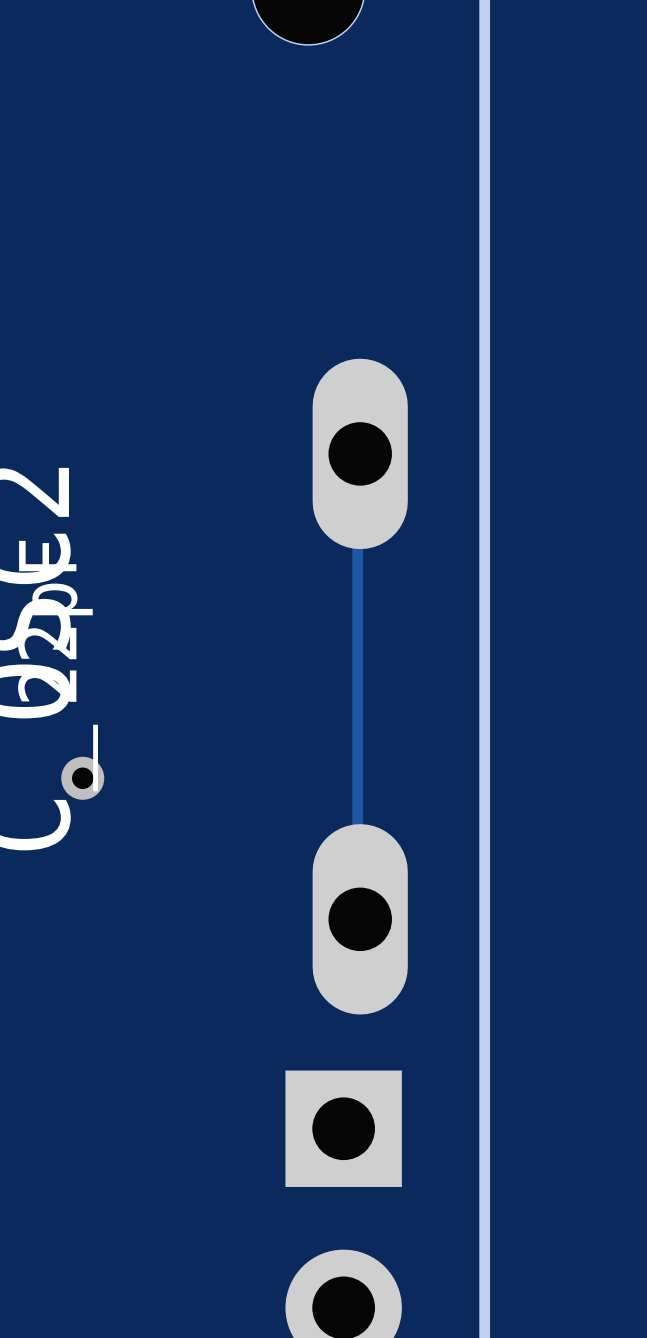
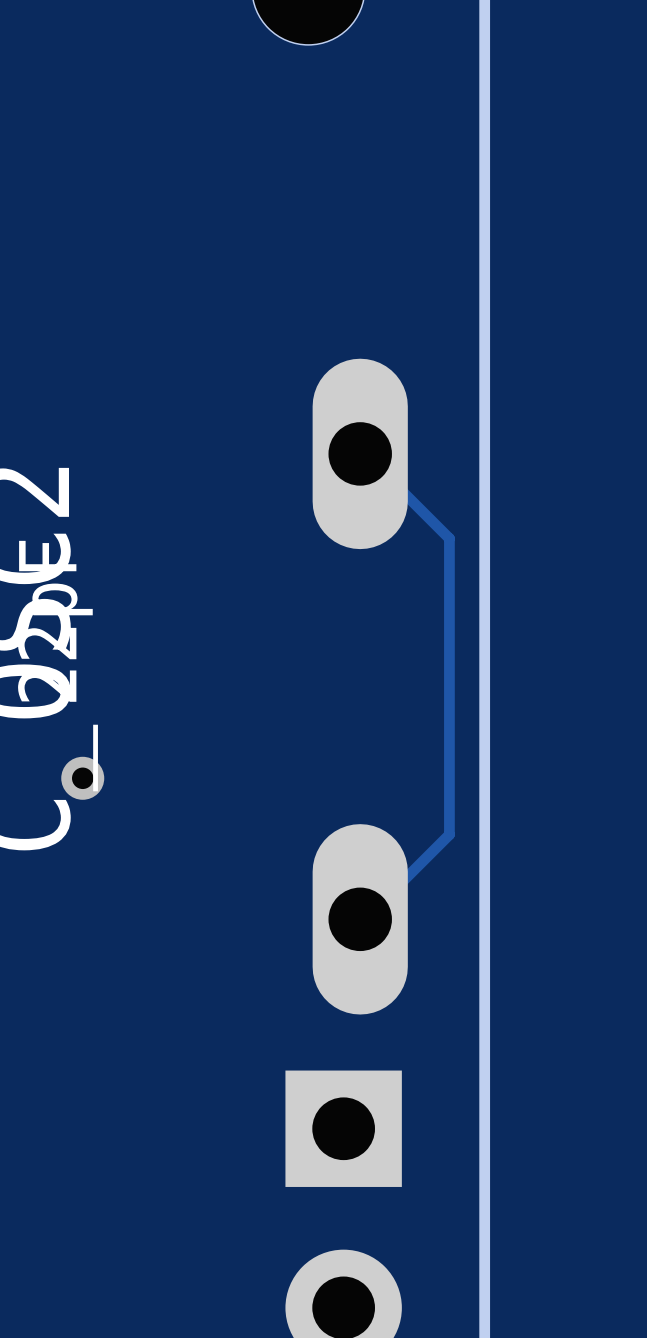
track: (360, 453) (357, 453) (357, 919) (360, 919) -> (360, 453) (364, 453) (449, 538) (449, 834) (364, 919) (360, 919)

